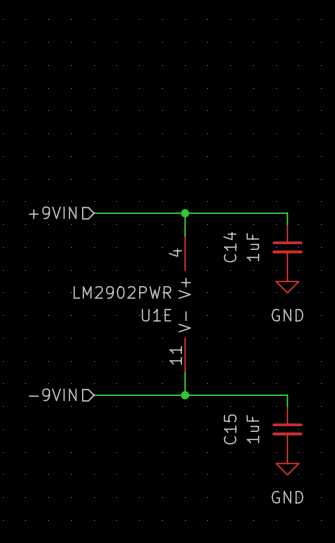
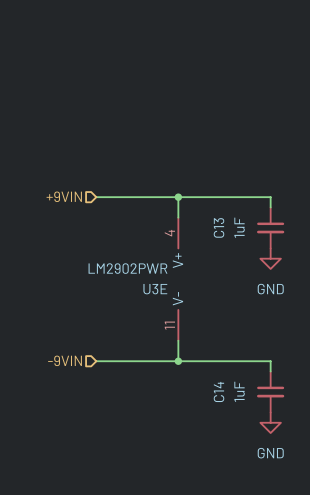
C14 name: C14 (229, 247) -> C13 (219, 227)
U1E name: U1E (156, 315) -> U3E (155, 289)
C15 name: C15 (230, 429) -> C14 (219, 391)

